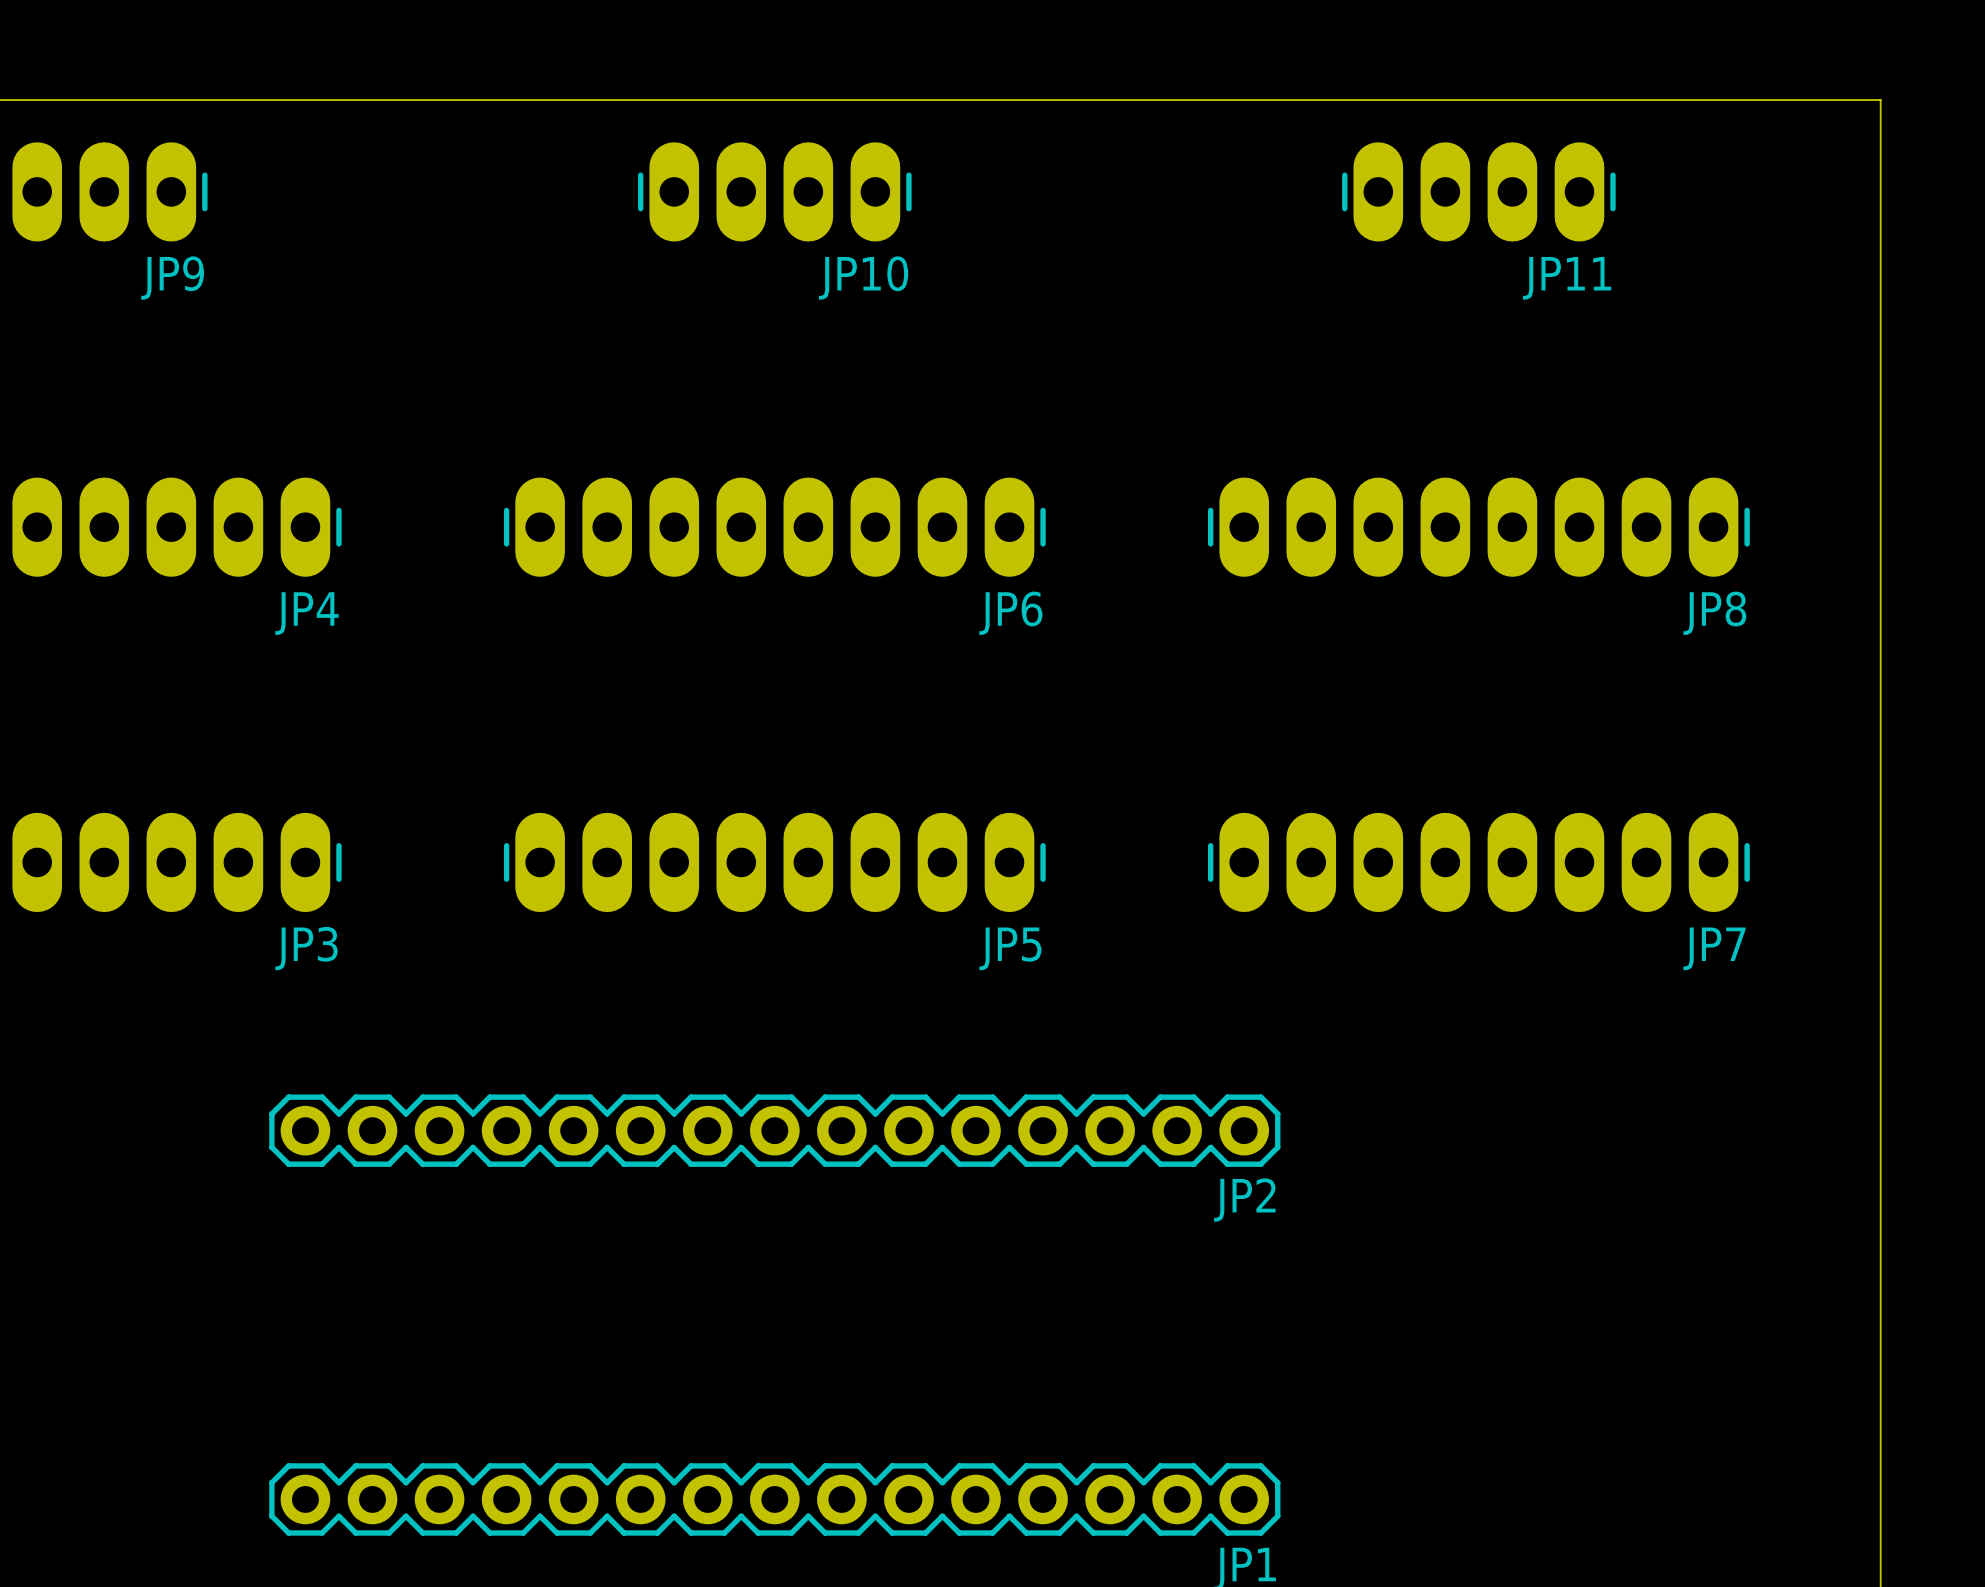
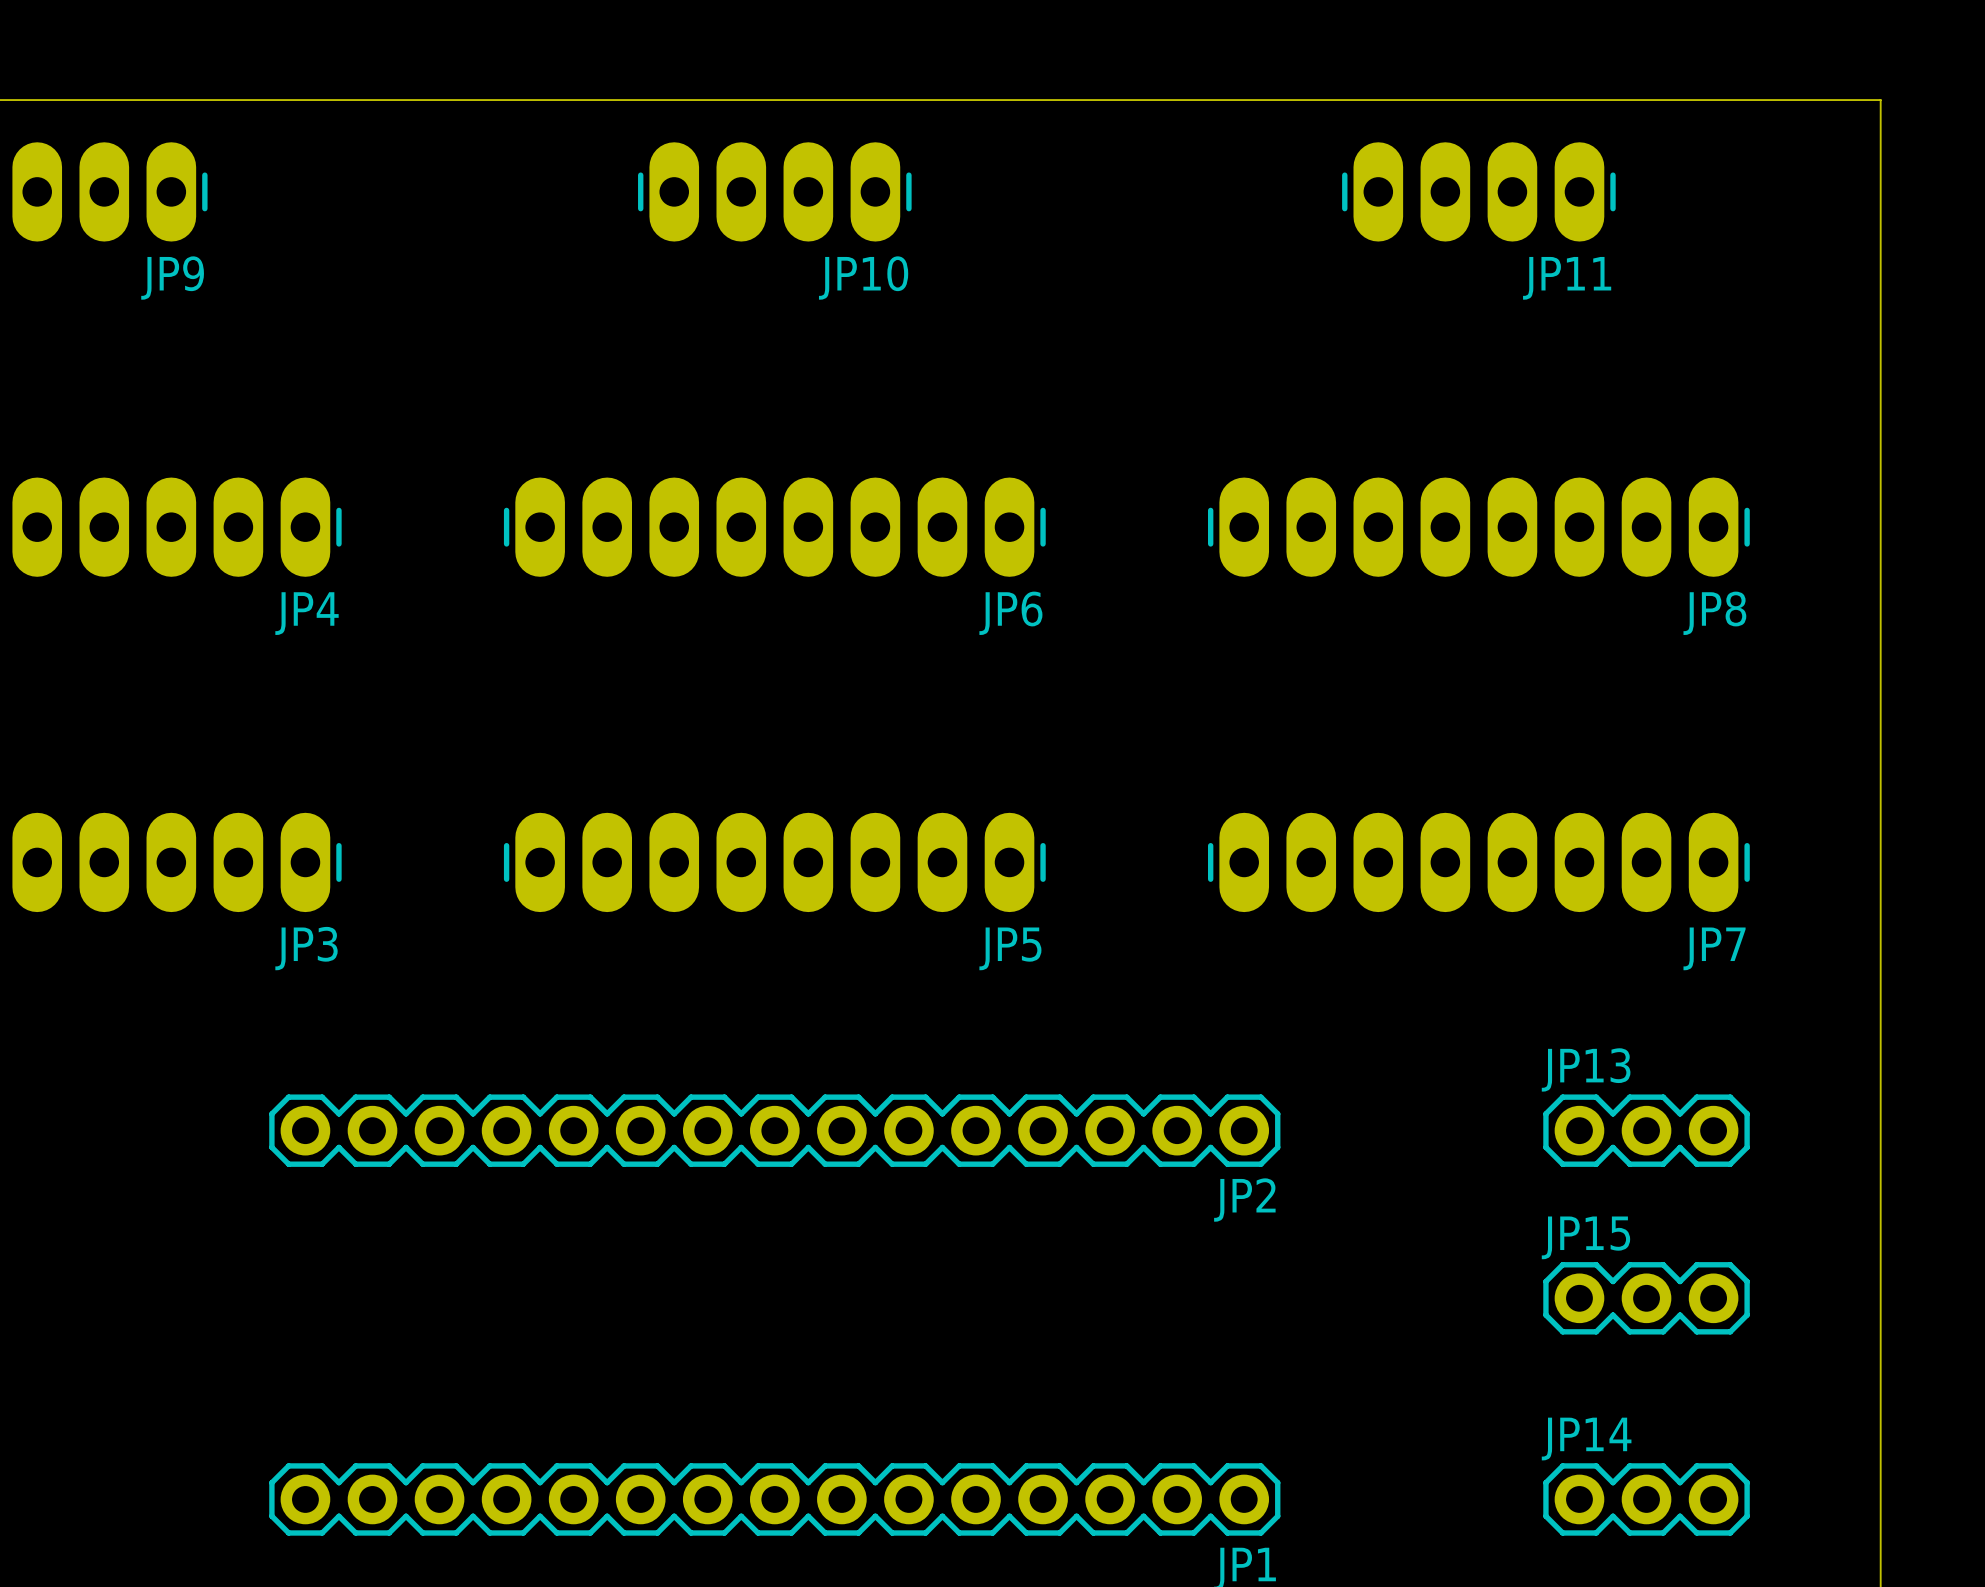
JP13: none -> (1646, 1130)
JP15: none -> (1646, 1298)
JP14: none -> (1646, 1499)

